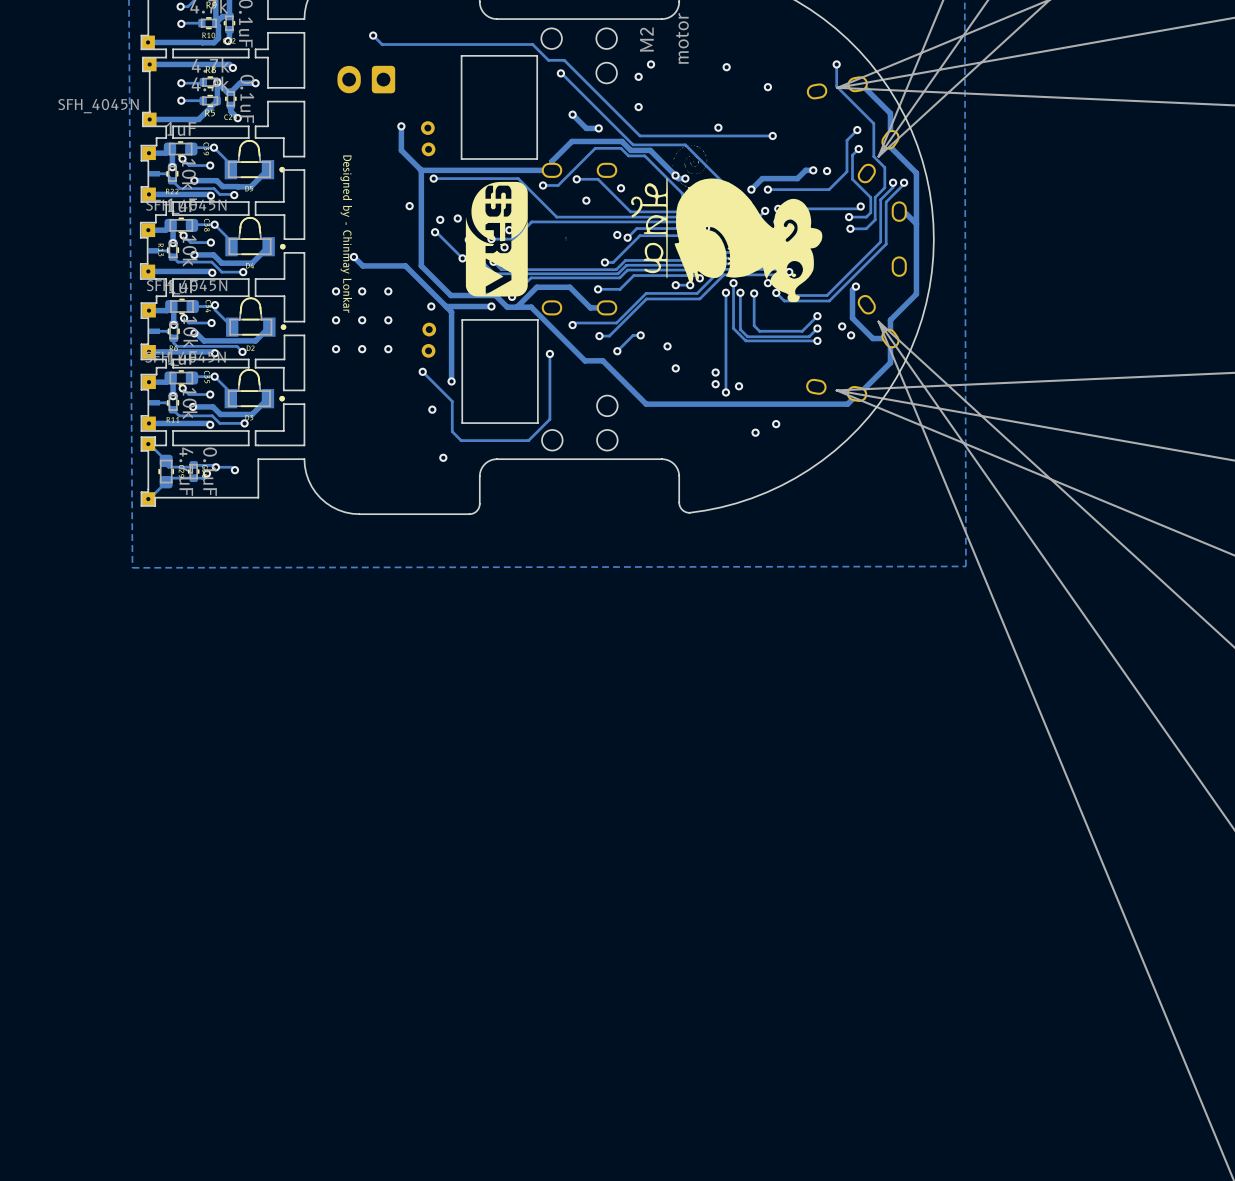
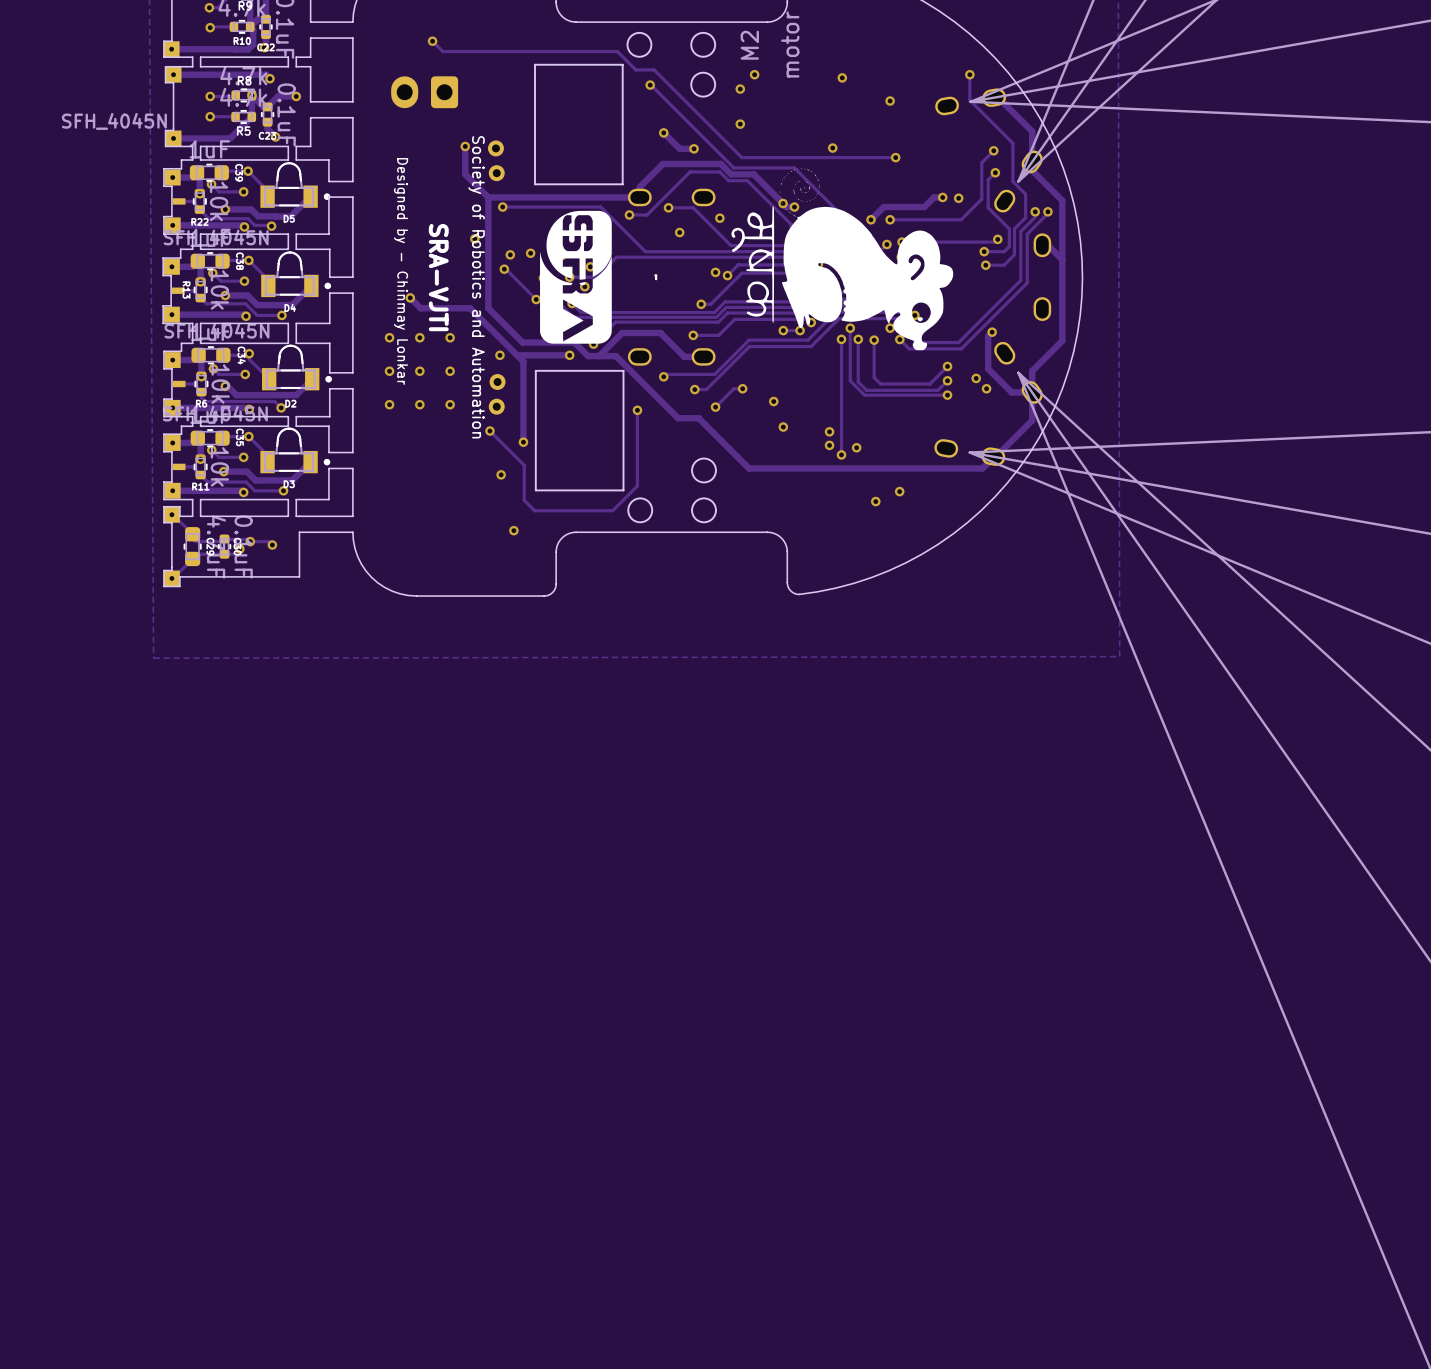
text: none -> SRA-VJTI (438, 277)
text: none -> Society of Robotics and Automation (476, 287)

